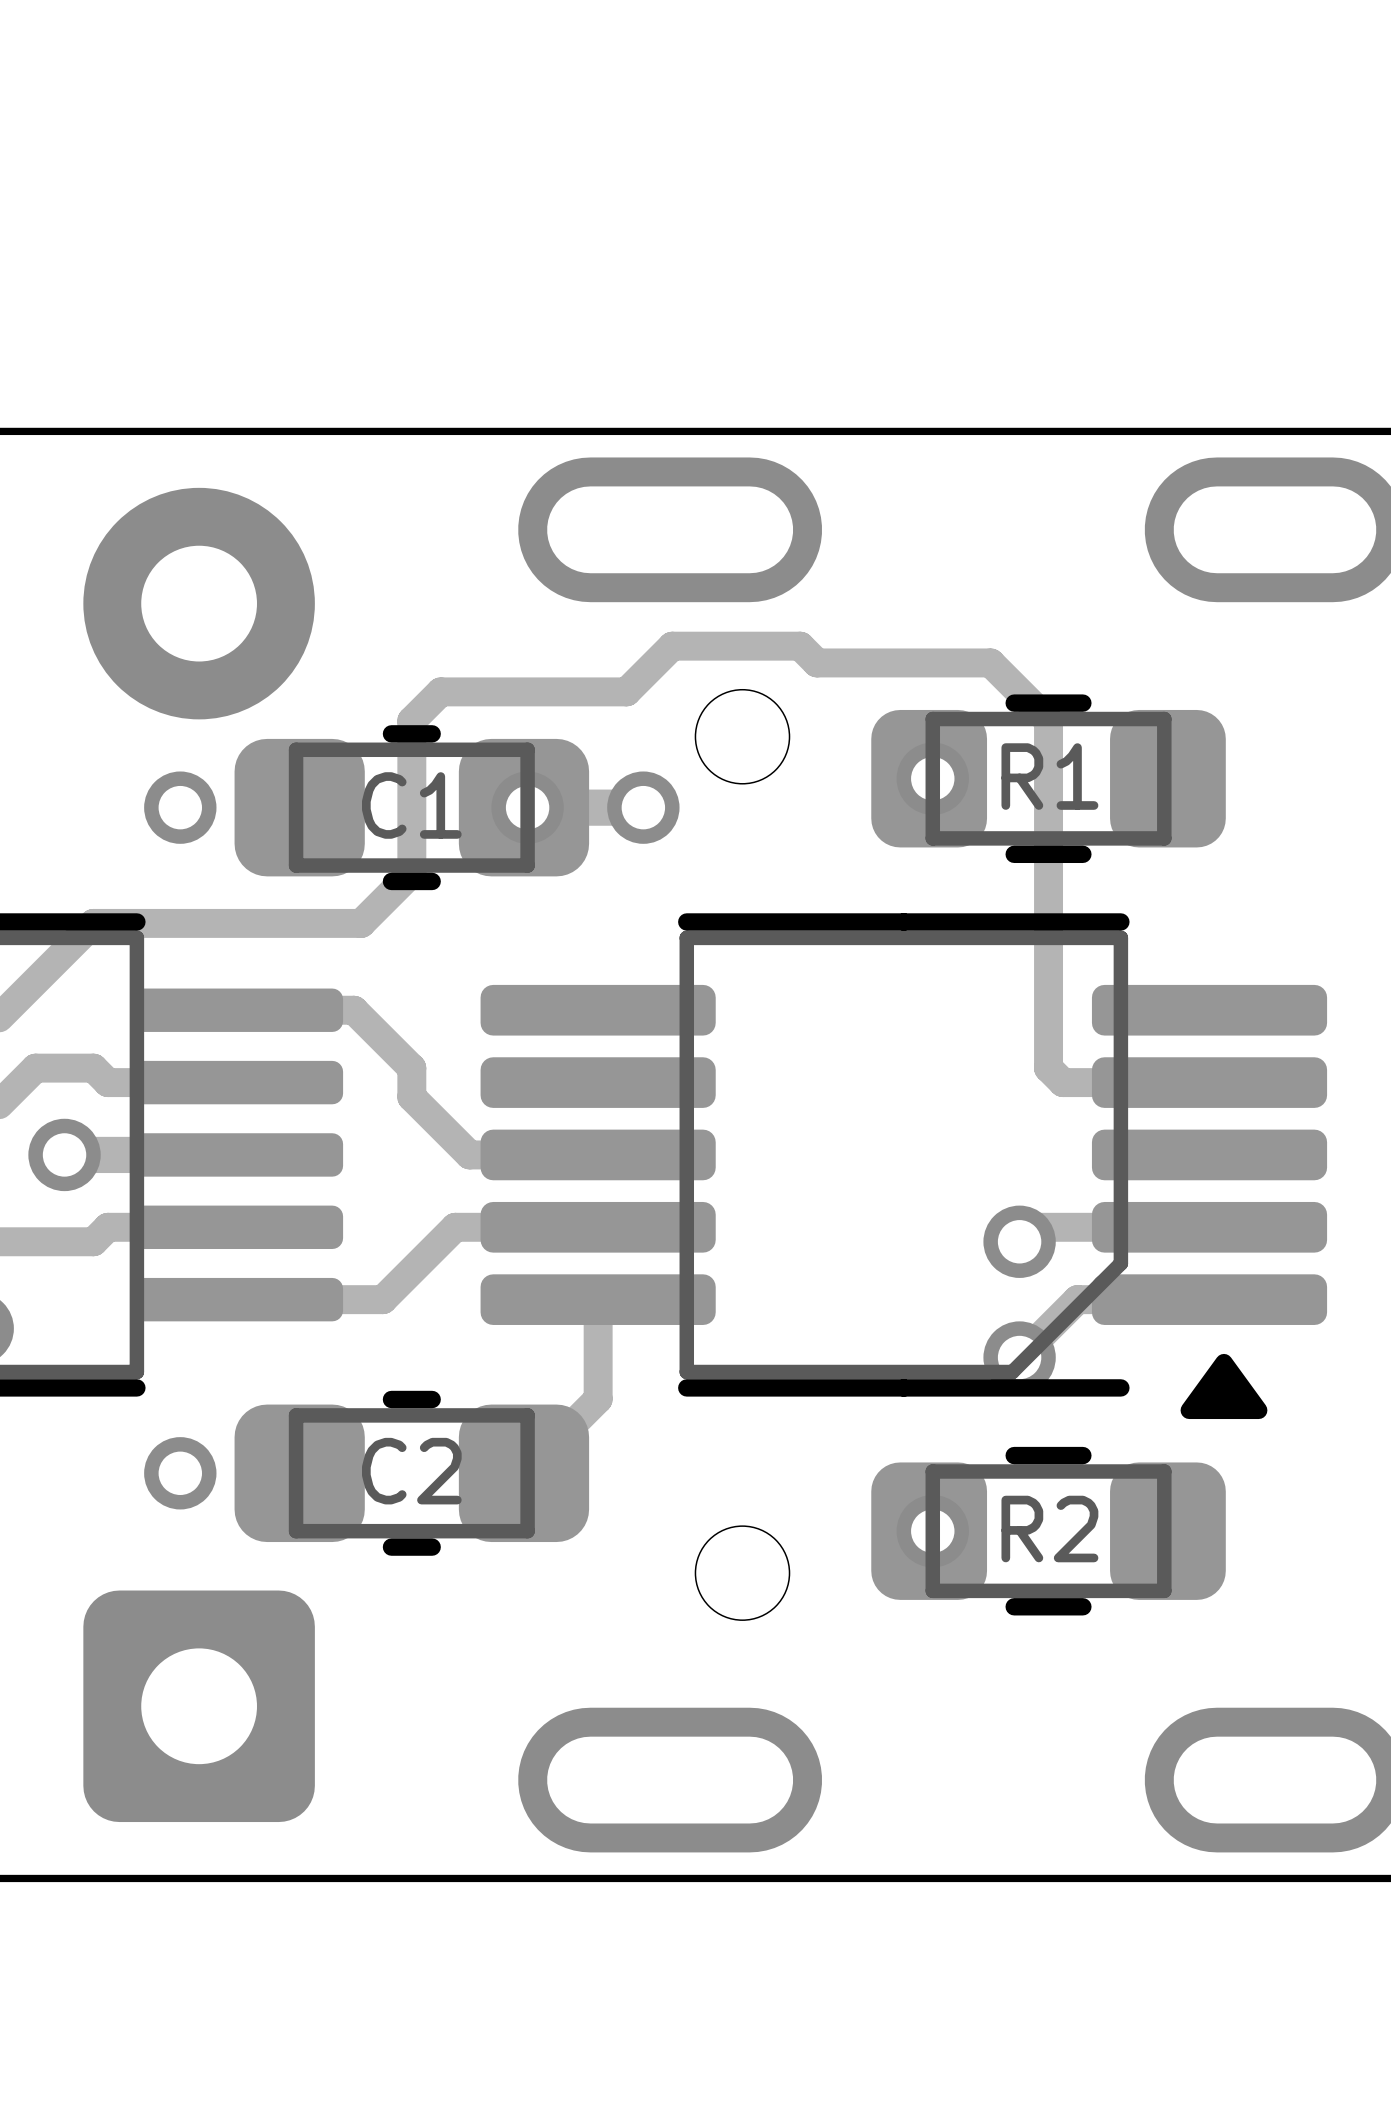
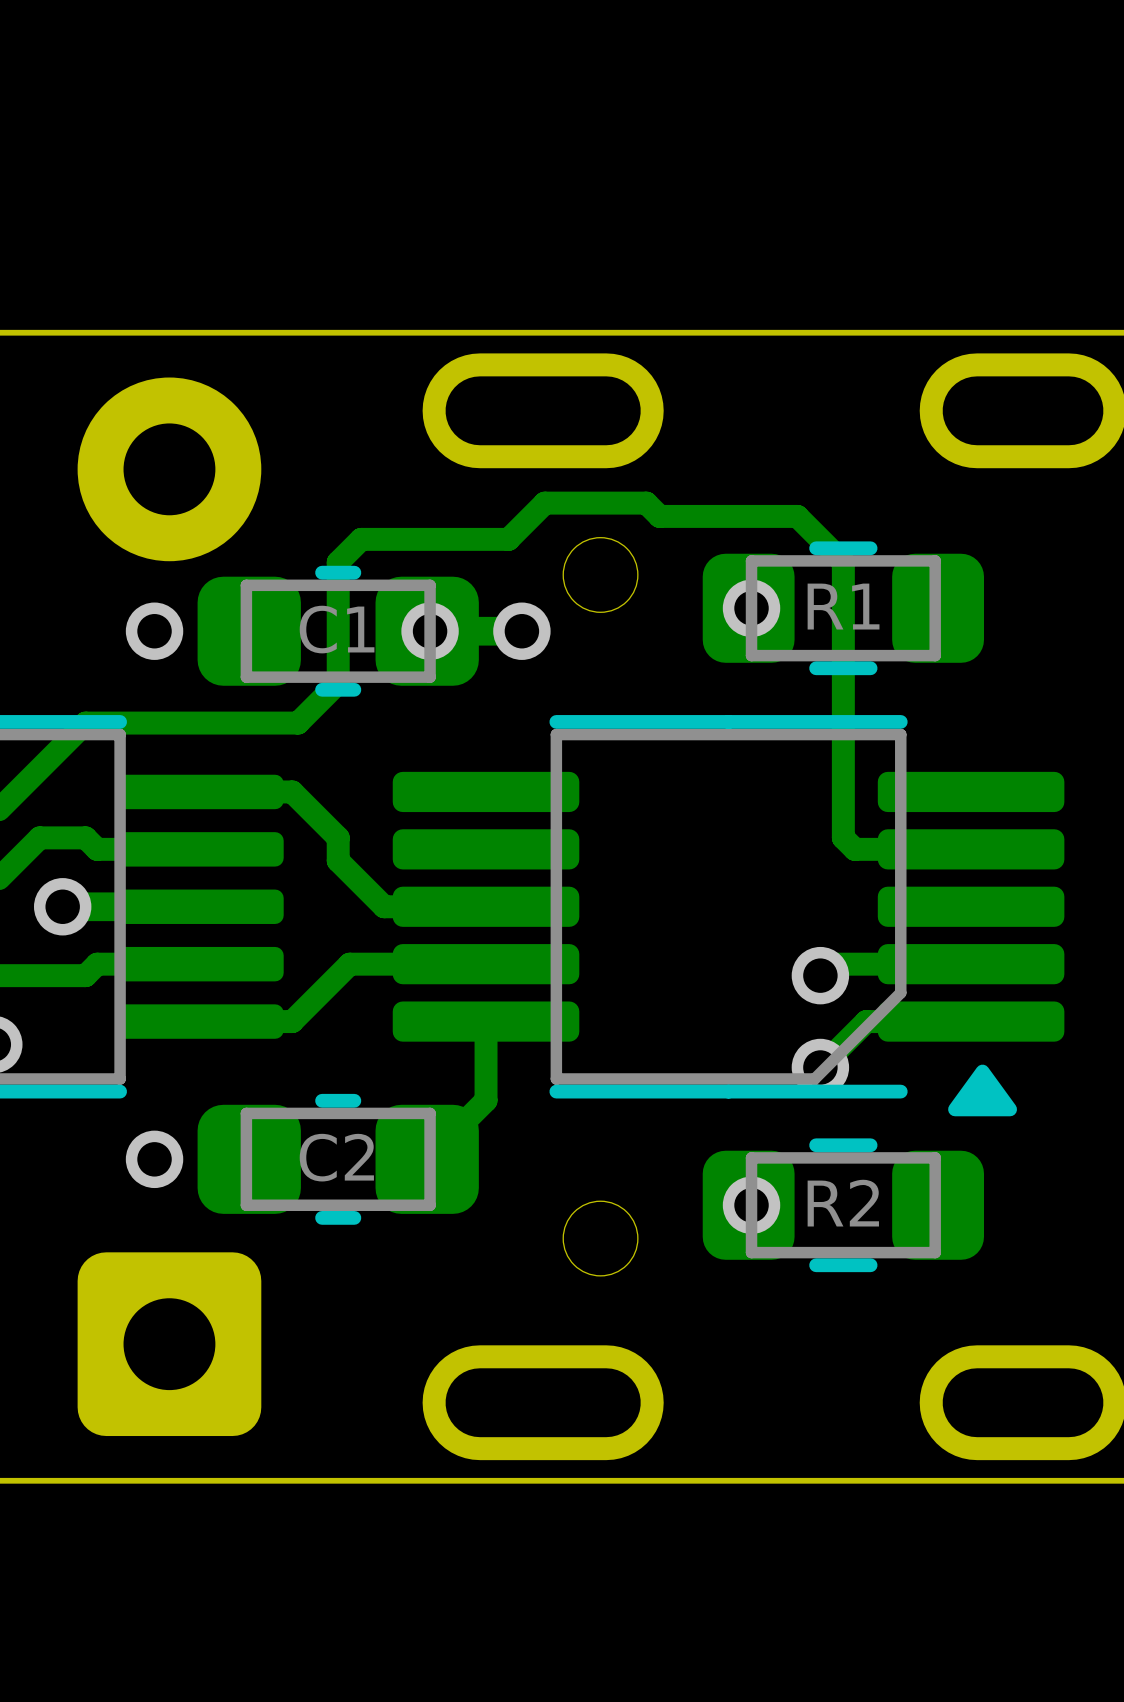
track: (455, 1227) (382, 1299) (353, 1299) -> (372, 964) (349, 964) (292, 1021)

